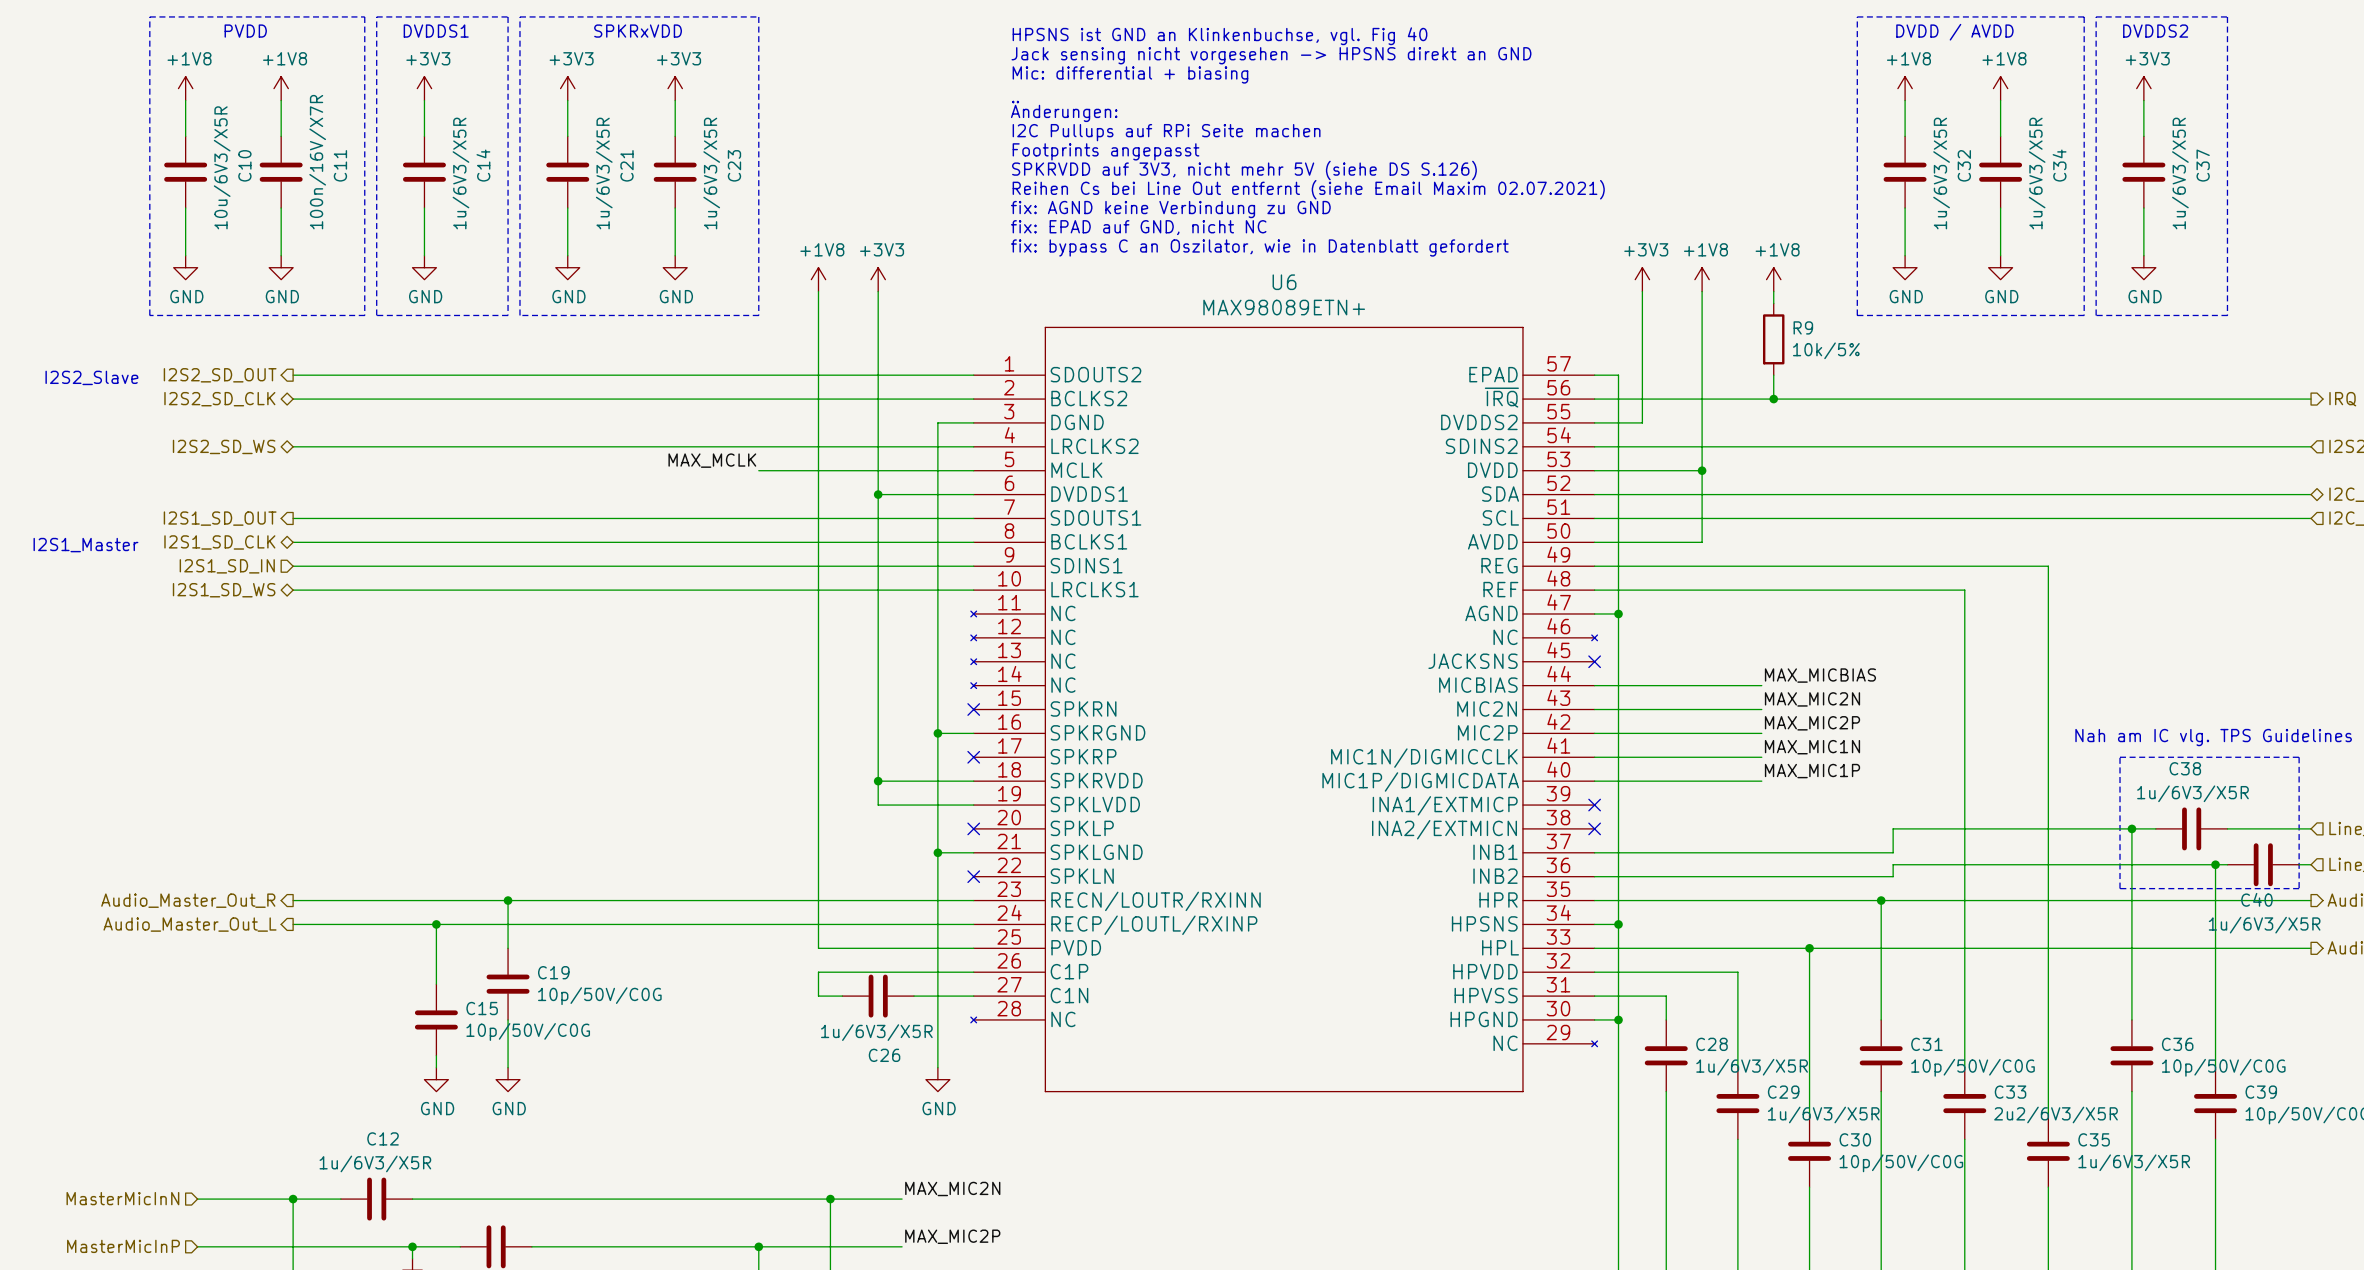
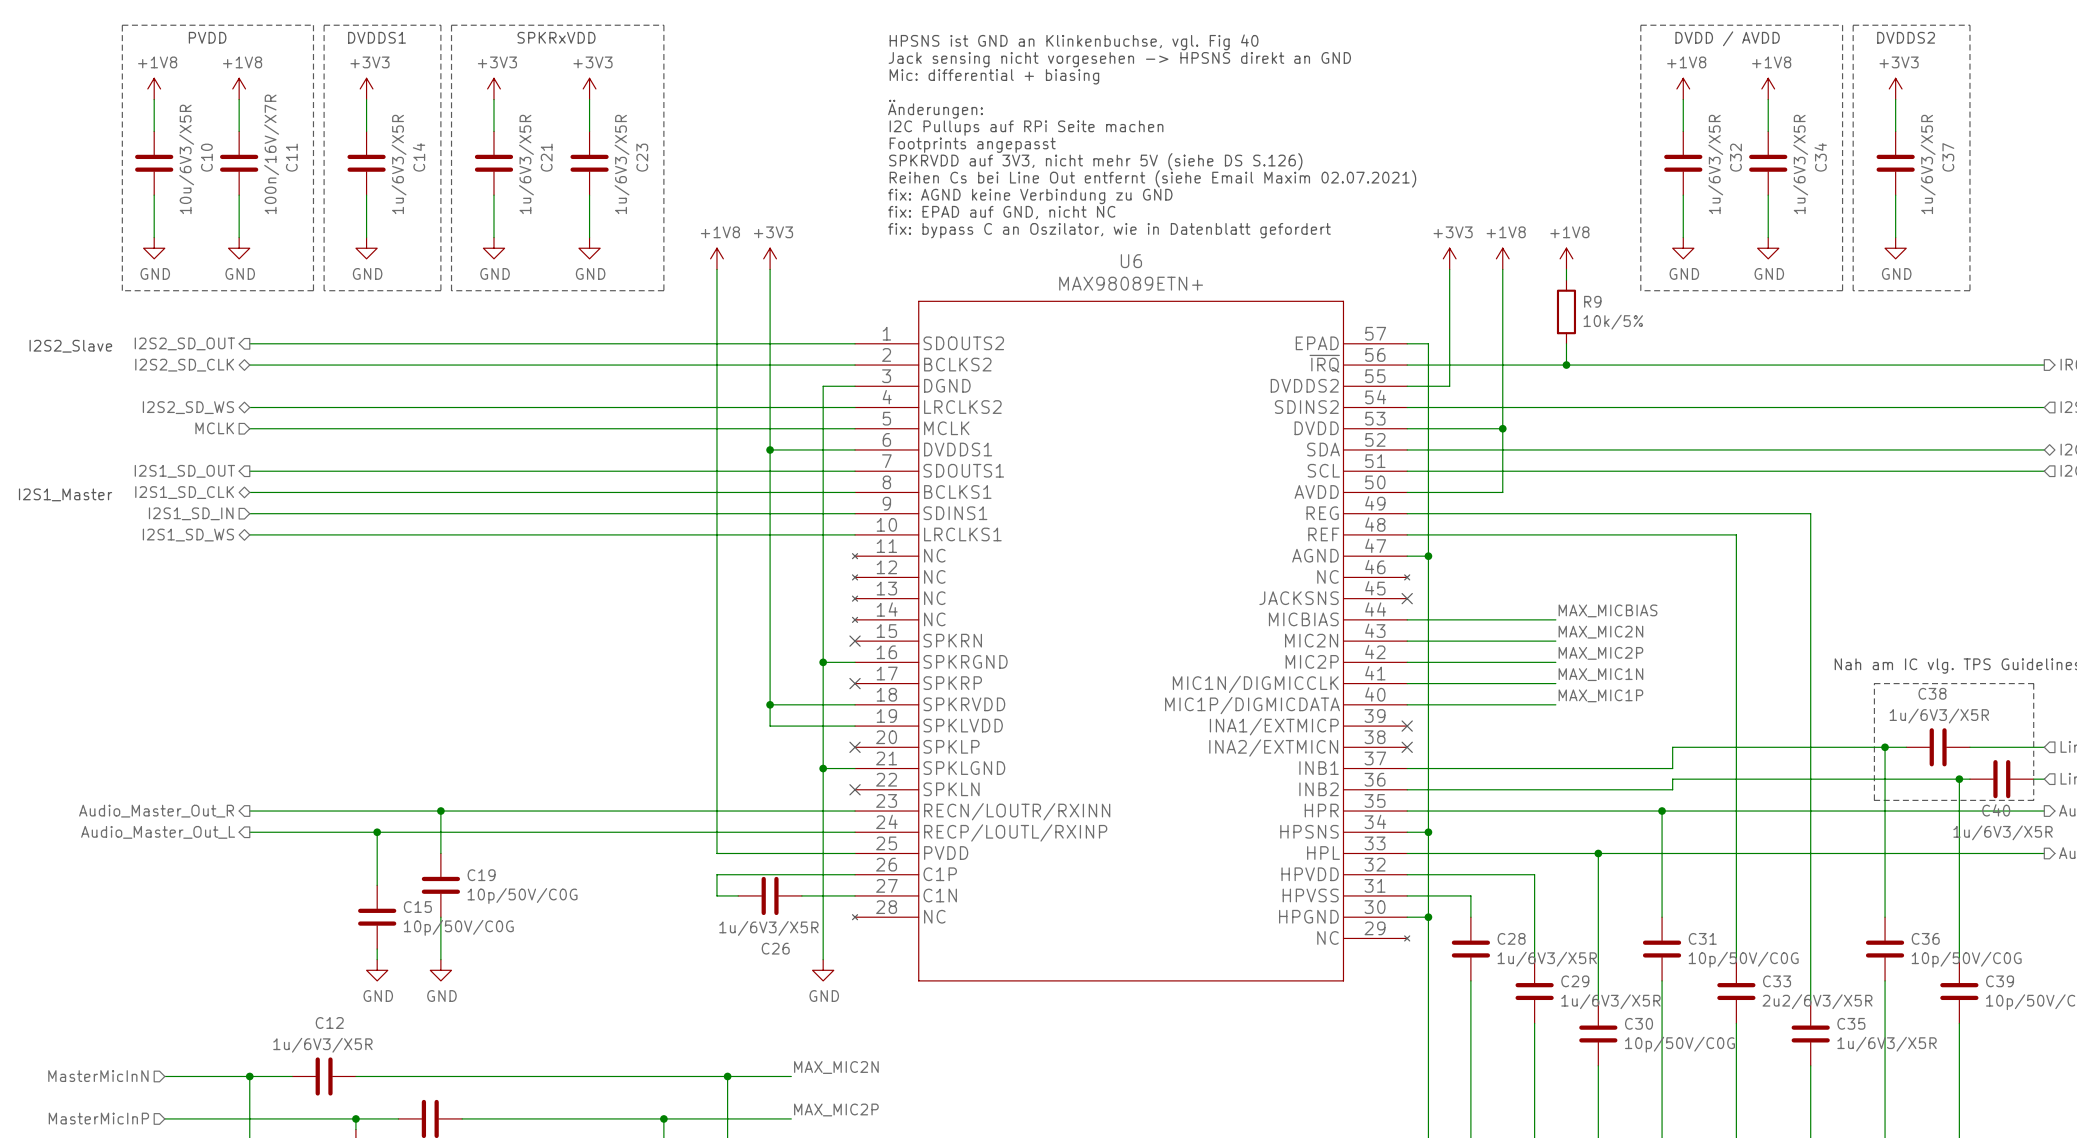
label: MAX_MCLK (712, 460) -> none
hierarchical label: none -> MCLK (214, 428)
wire: none -> (249, 428) (663, 428)

